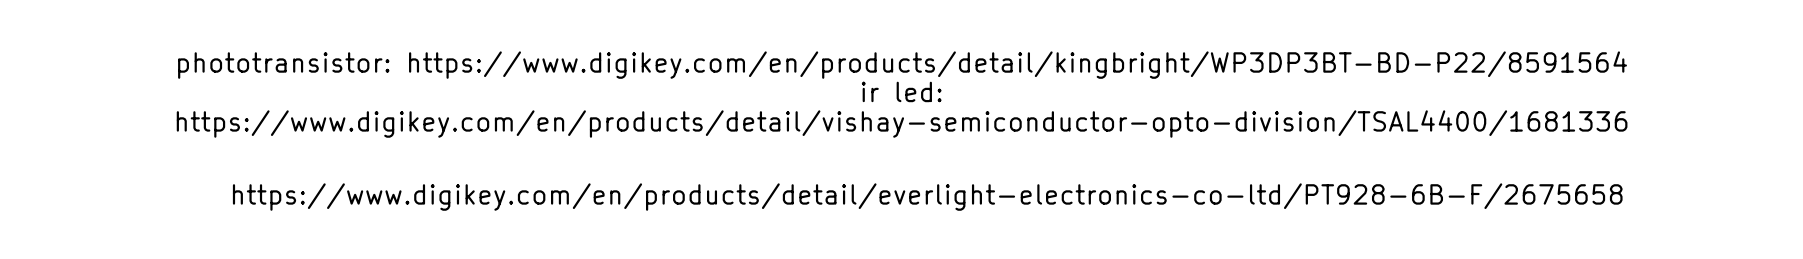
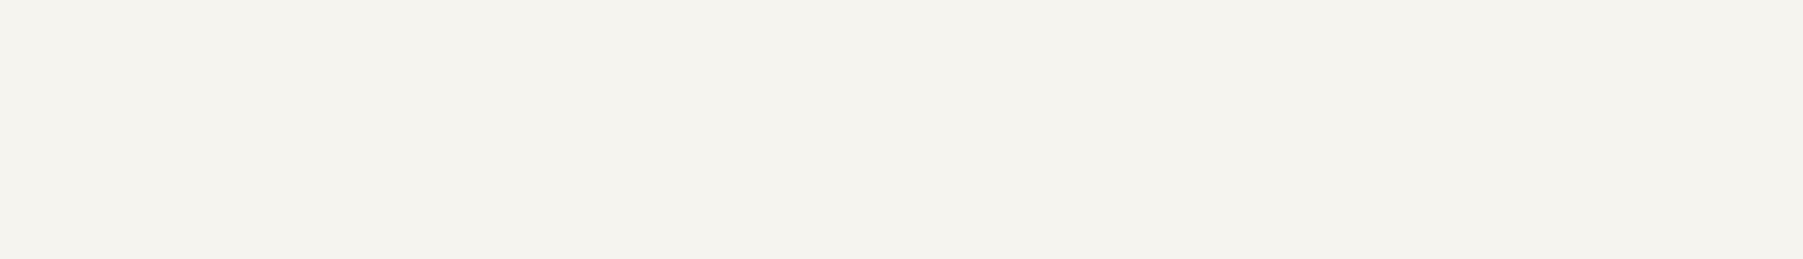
text: phototransistor: https://www.digikey.com/en/products/detail/kingbright/WP3DP3BT-BD-P22/8591564 (902, 65) -> none
text: ir led: (901, 91) -> none
text: https://www.digikey.com/en/products/detail/vishay-semiconductor-opto-division/TSAL4400/1681336 (902, 124) -> none
text: https://www.digikey.com/en/products/detail/everlight-electronics-co-ltd/PT928-6B-F/2675658 (927, 197) -> none

